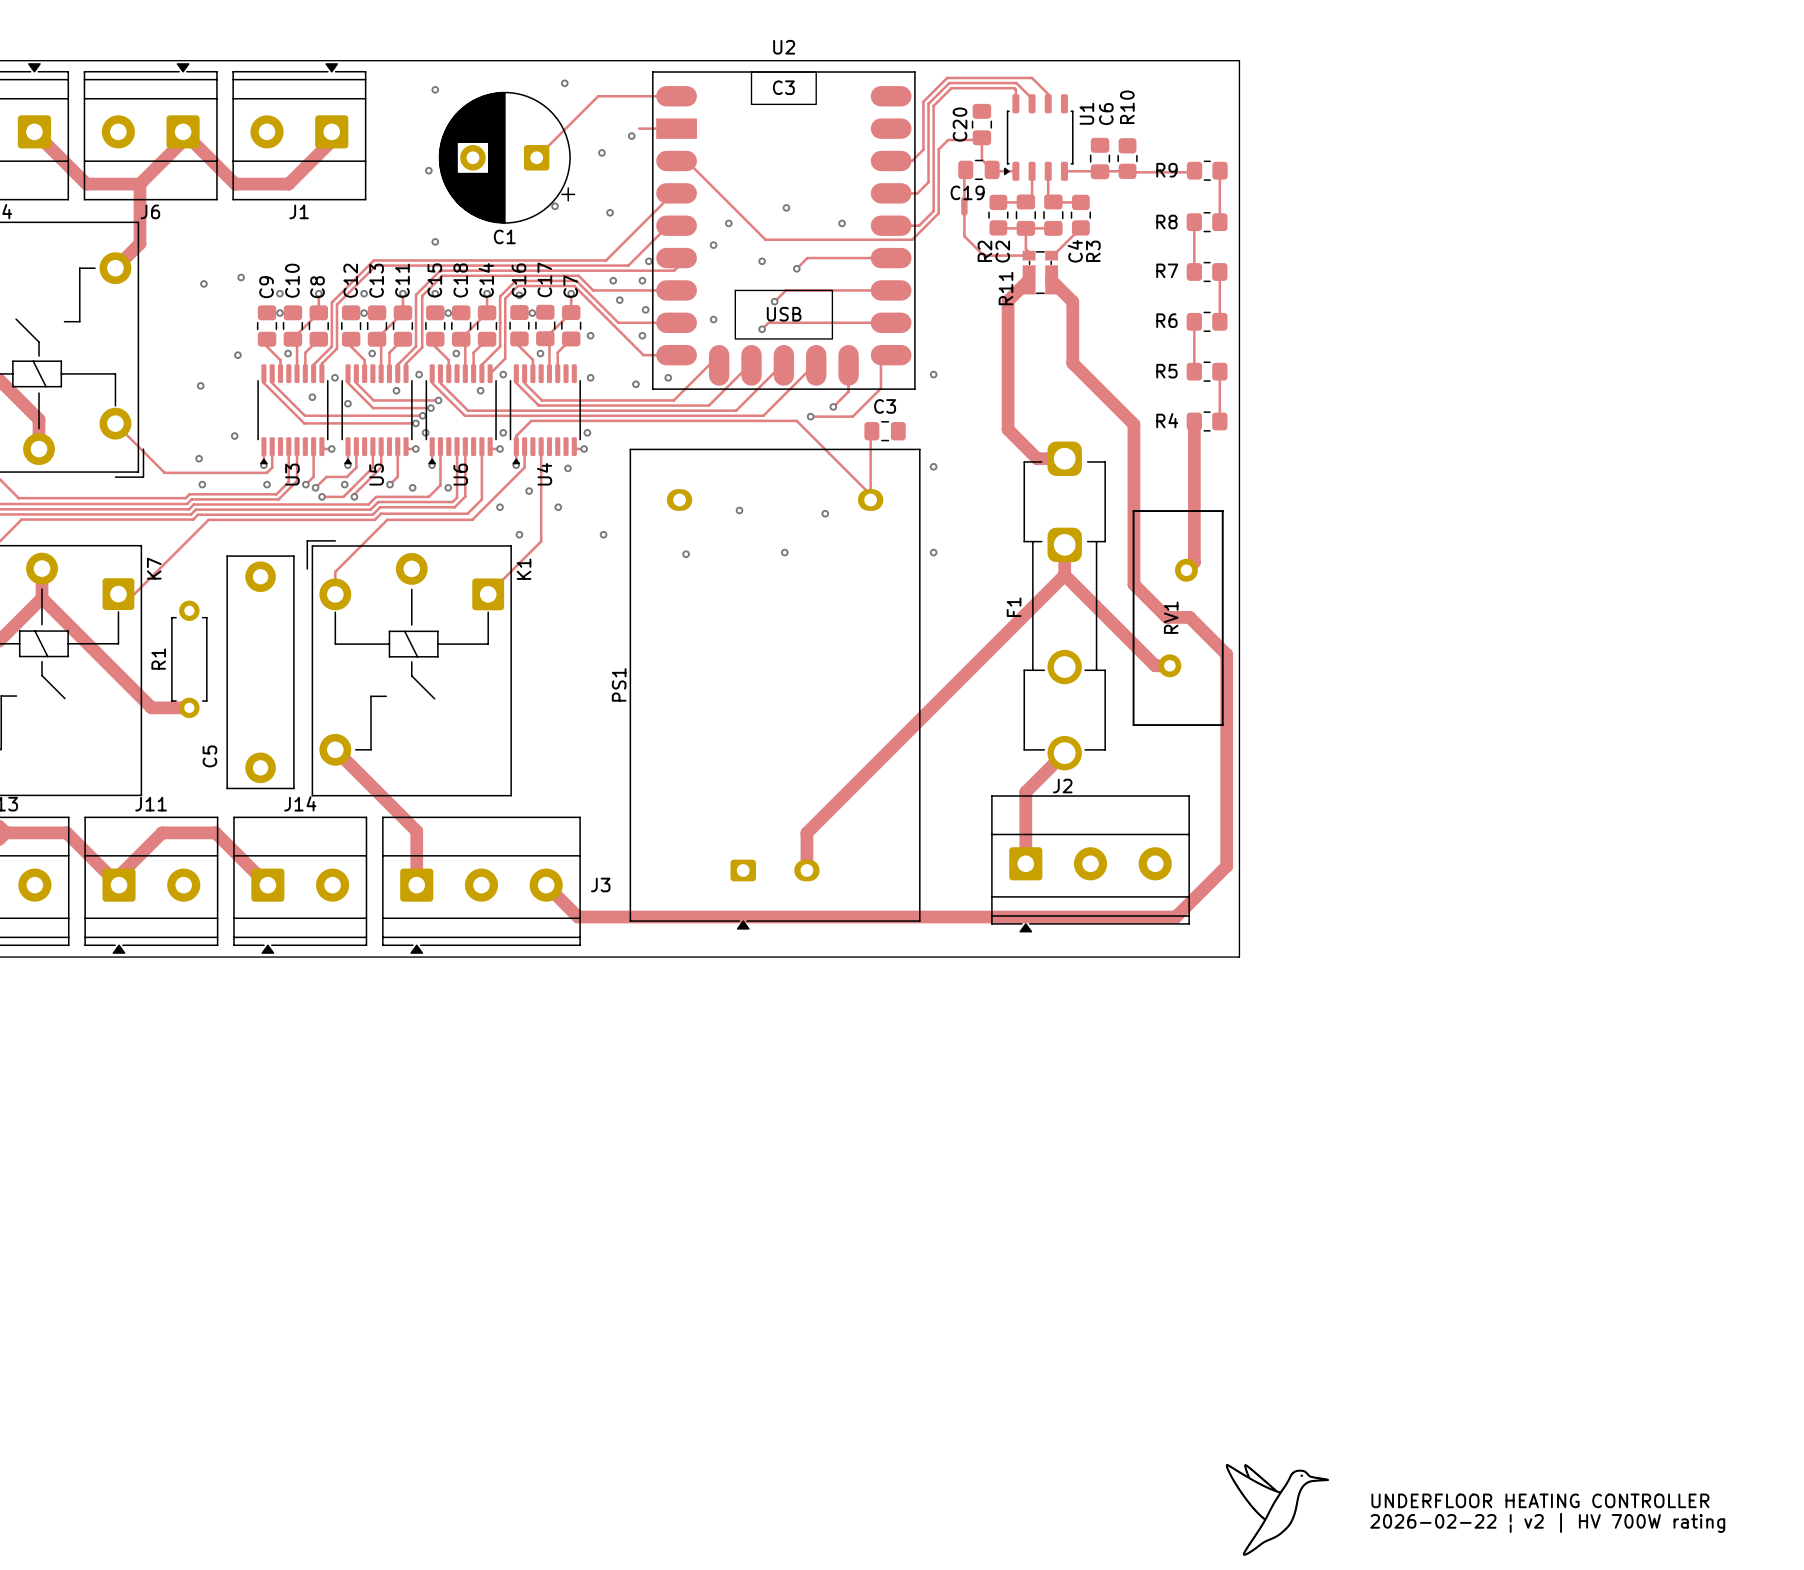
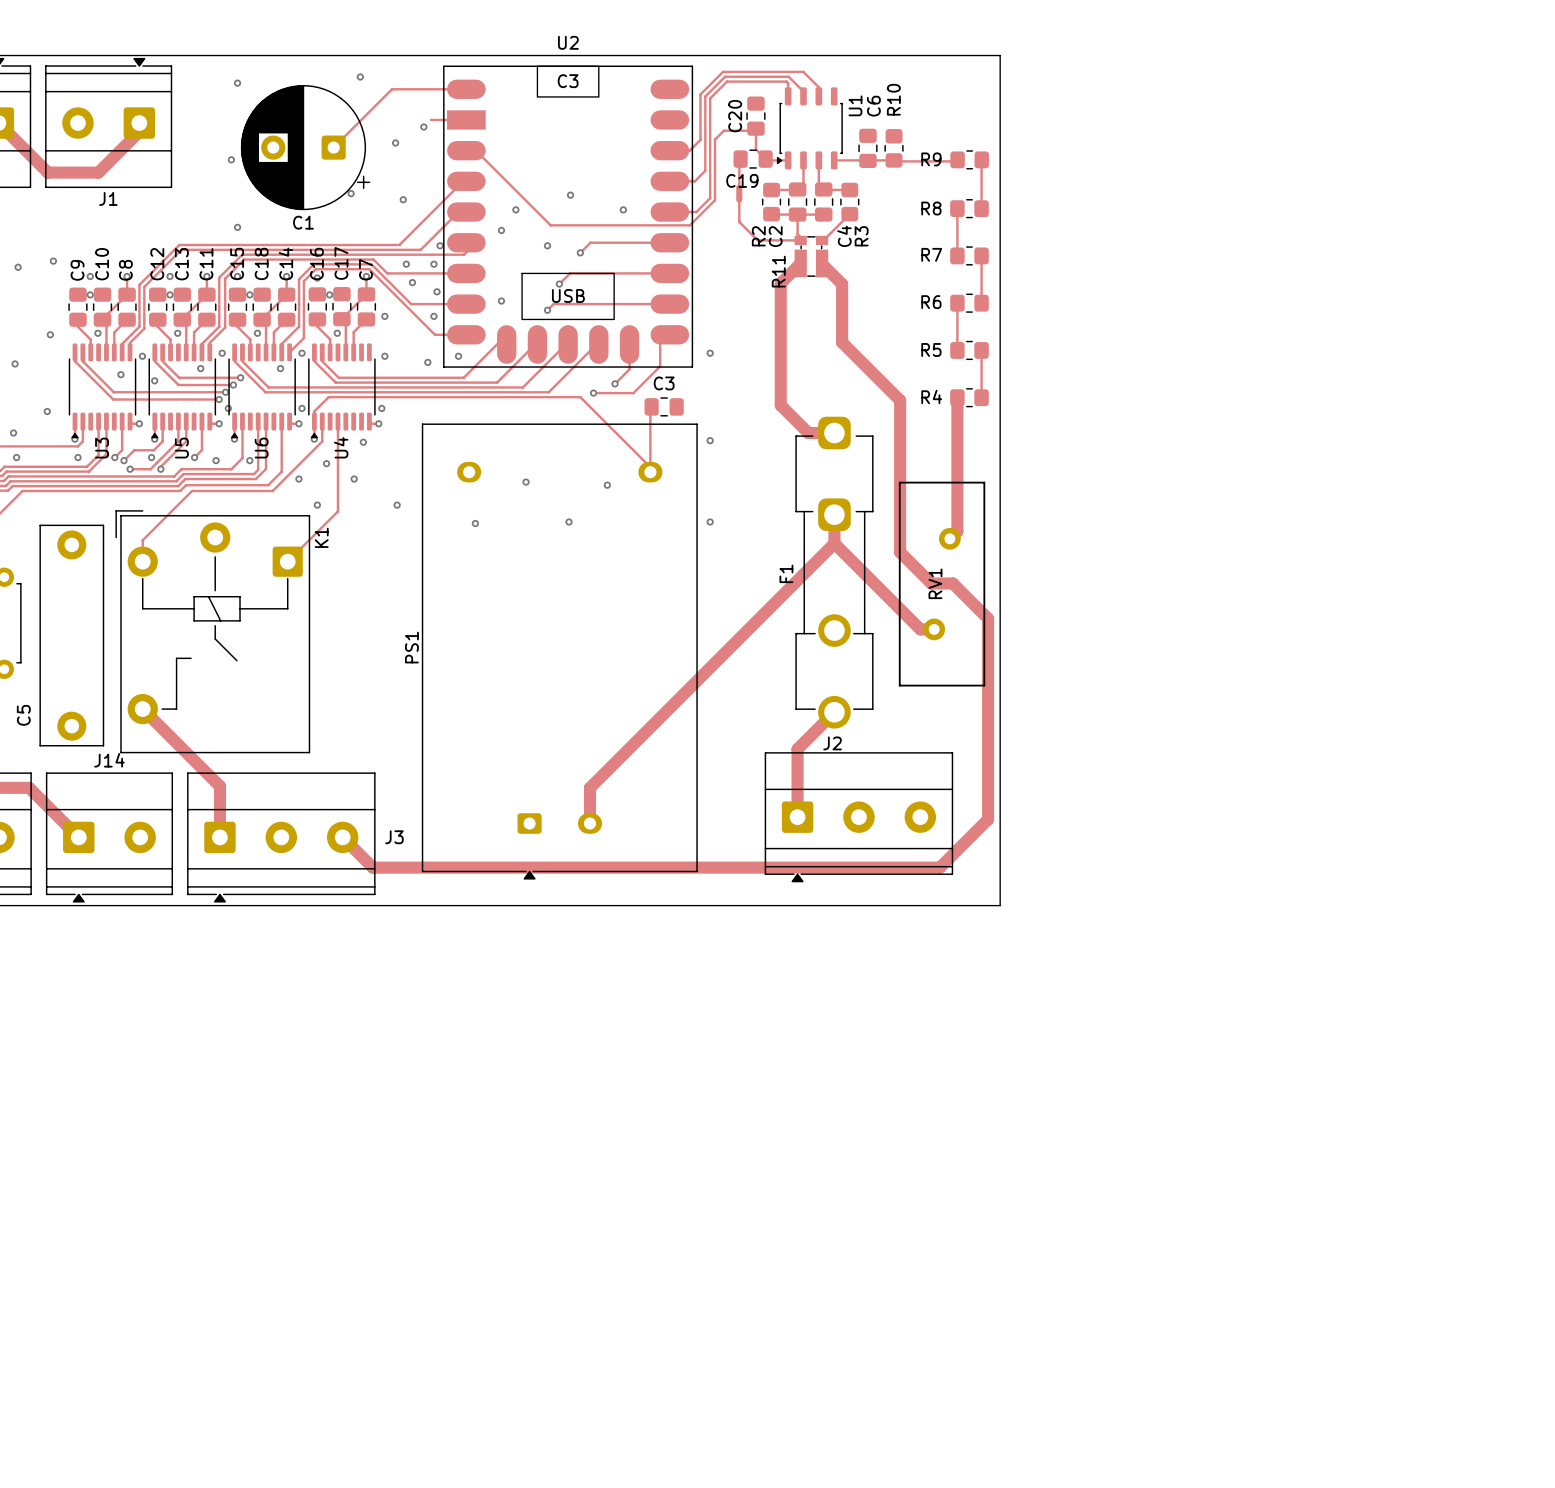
drawing: [1225, 1463, 1330, 1556] -> none
text: UNDERFLOOR HEATING CONTROLLER (1540, 1500) -> none
text: 2026-02-22 ¦ v2 | HV 700W rating (1547, 1522) -> none

